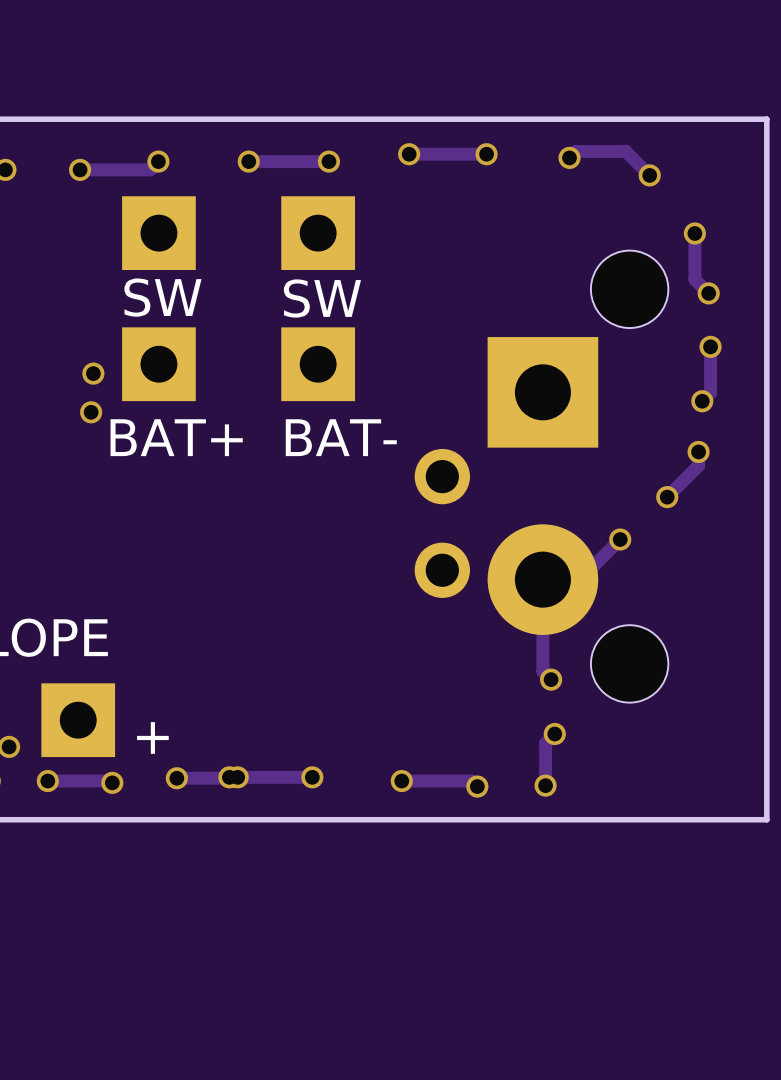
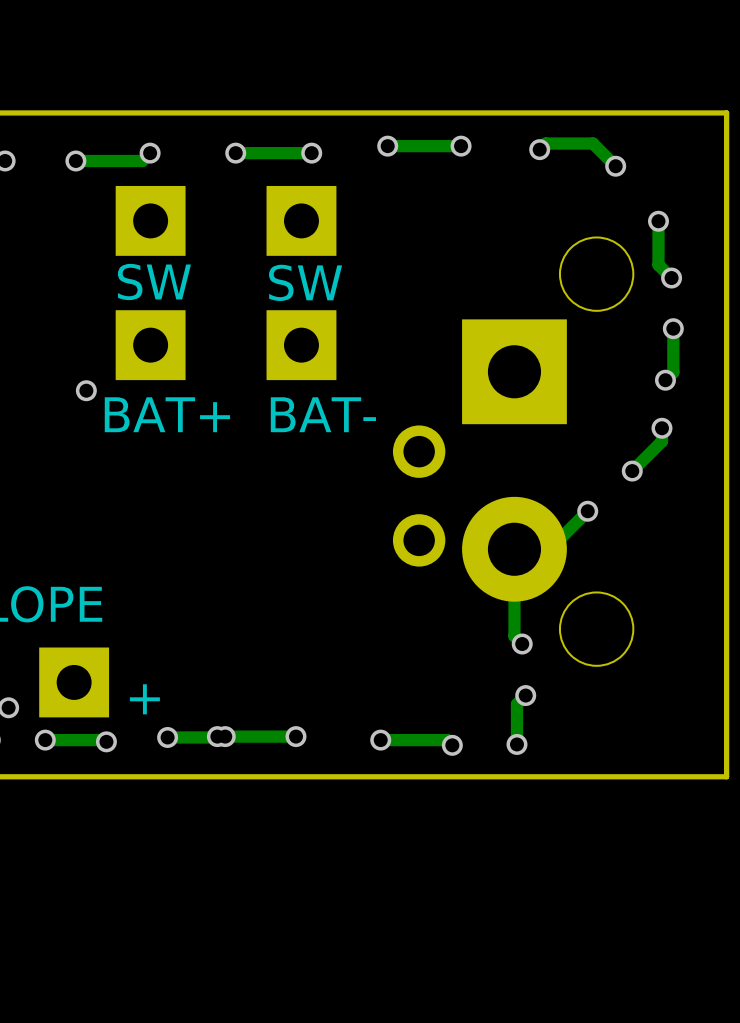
via: (93, 373) -> none

